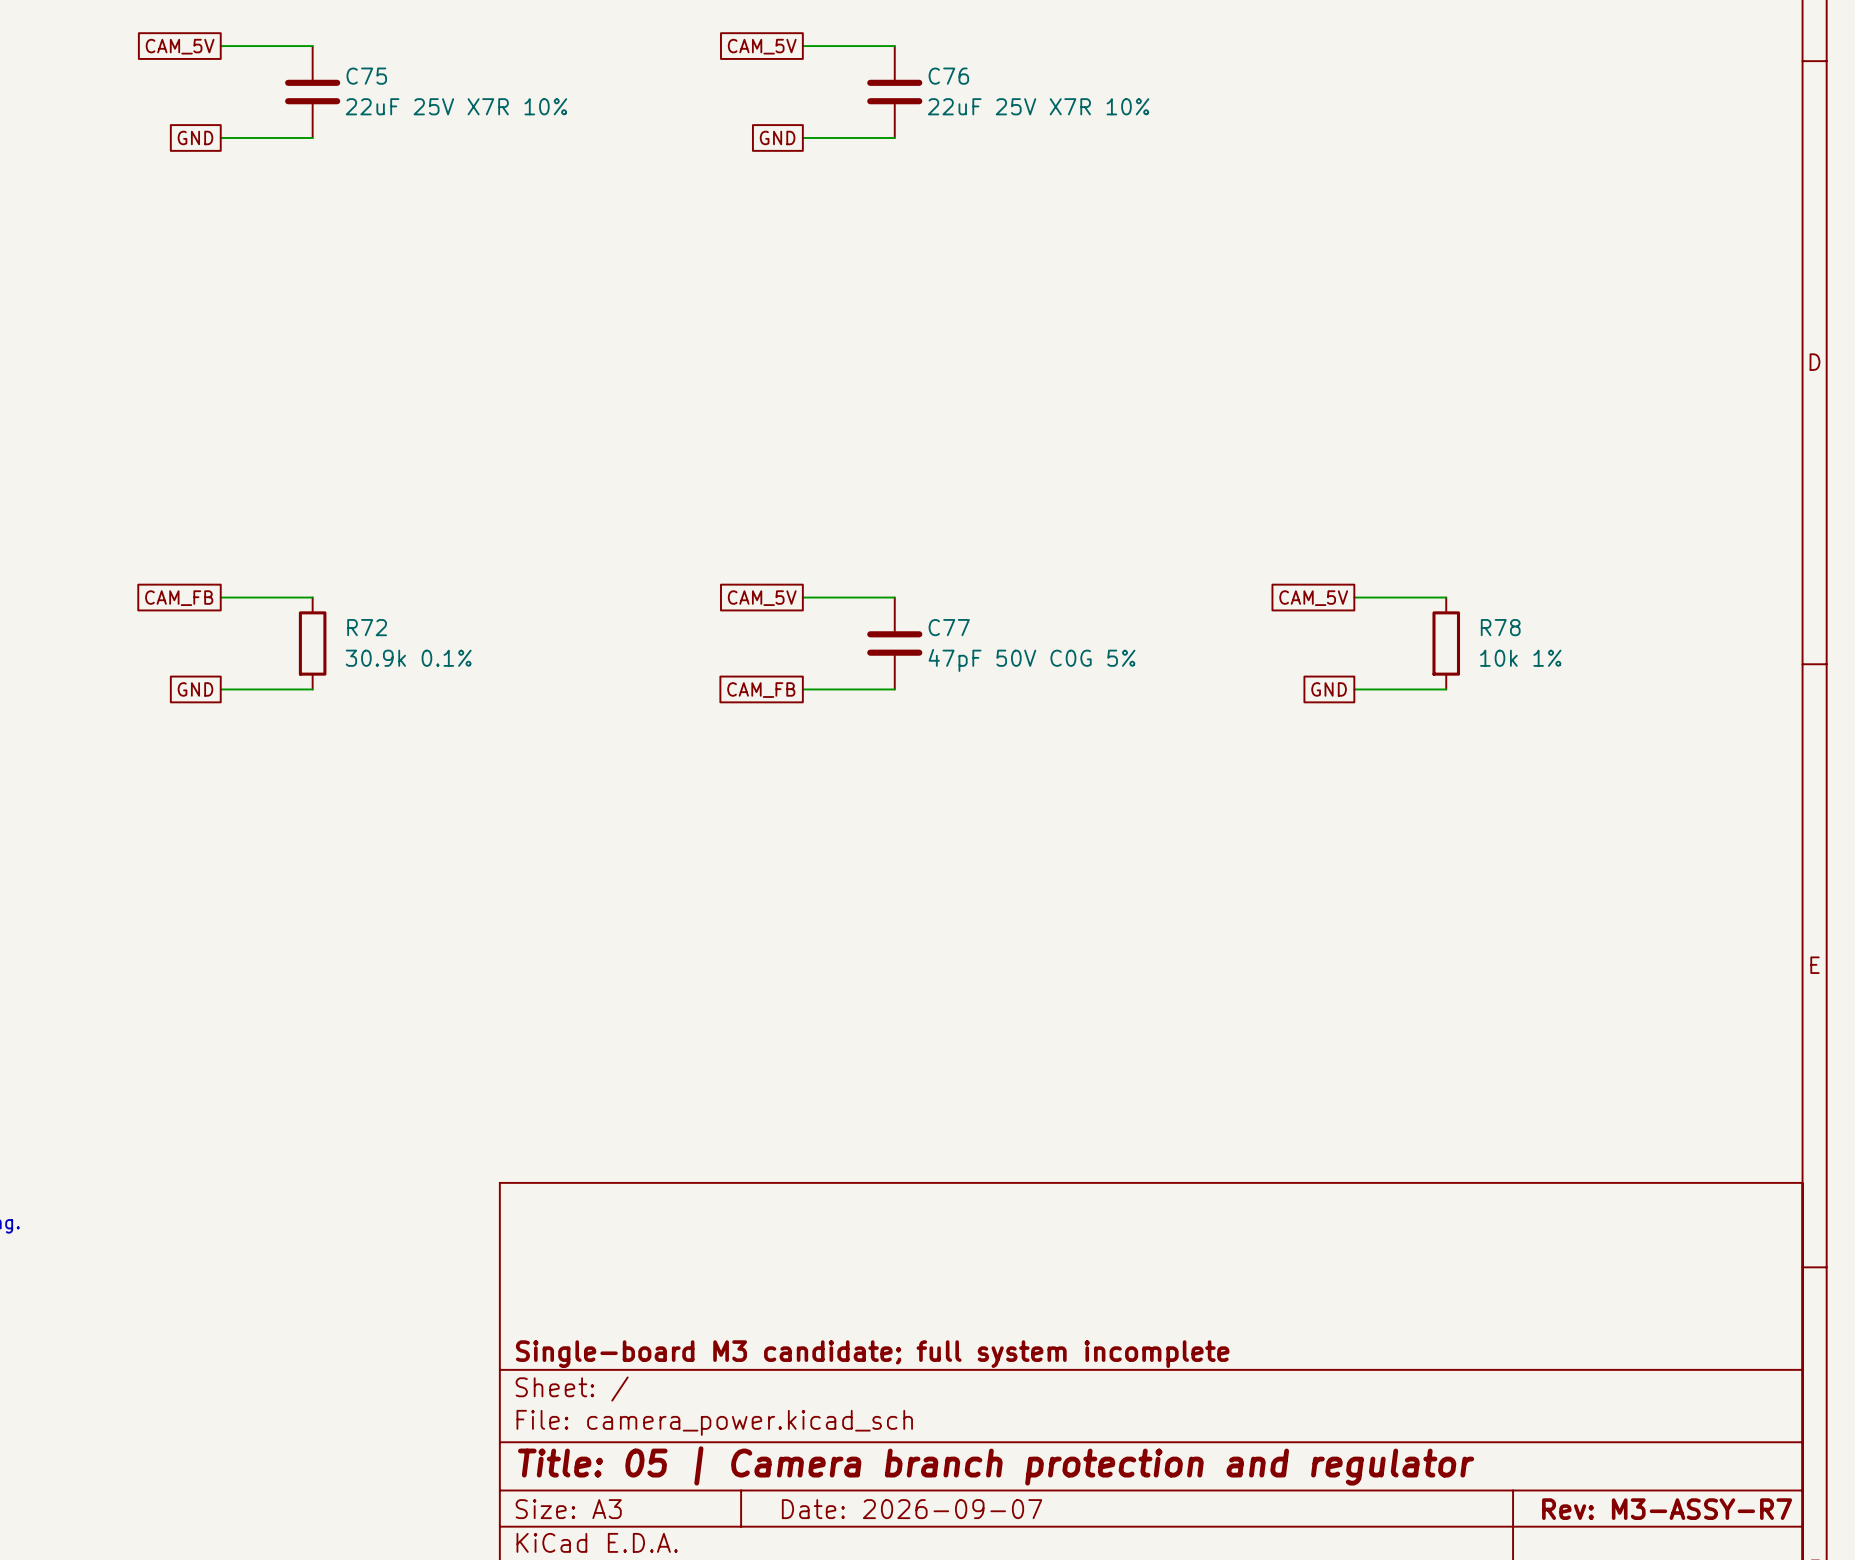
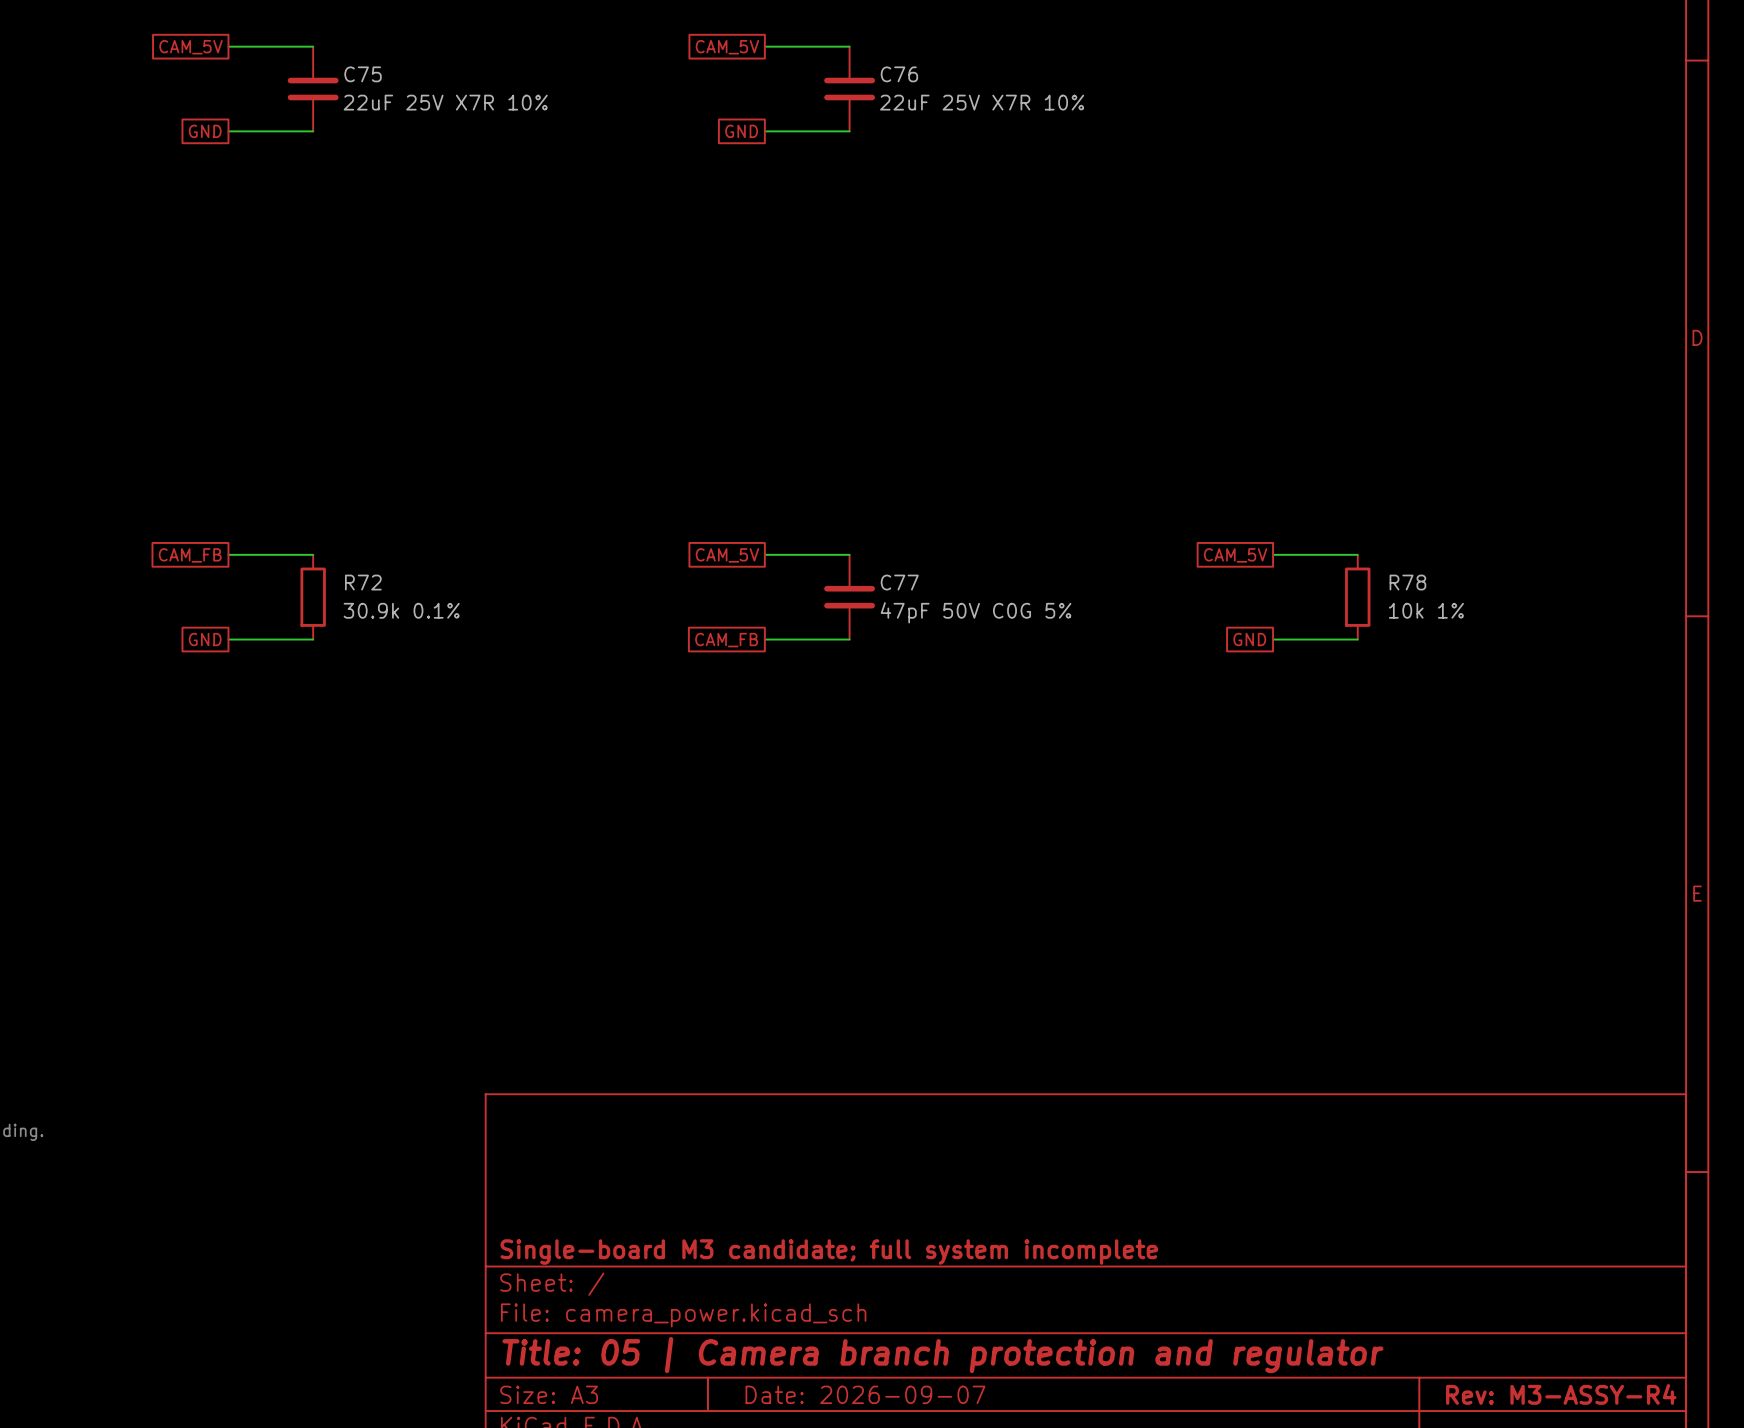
title block: Rev: M3-ASSY-R7 (1667, 1509) -> Rev: M3-ASSY-R4 (1561, 1394)

